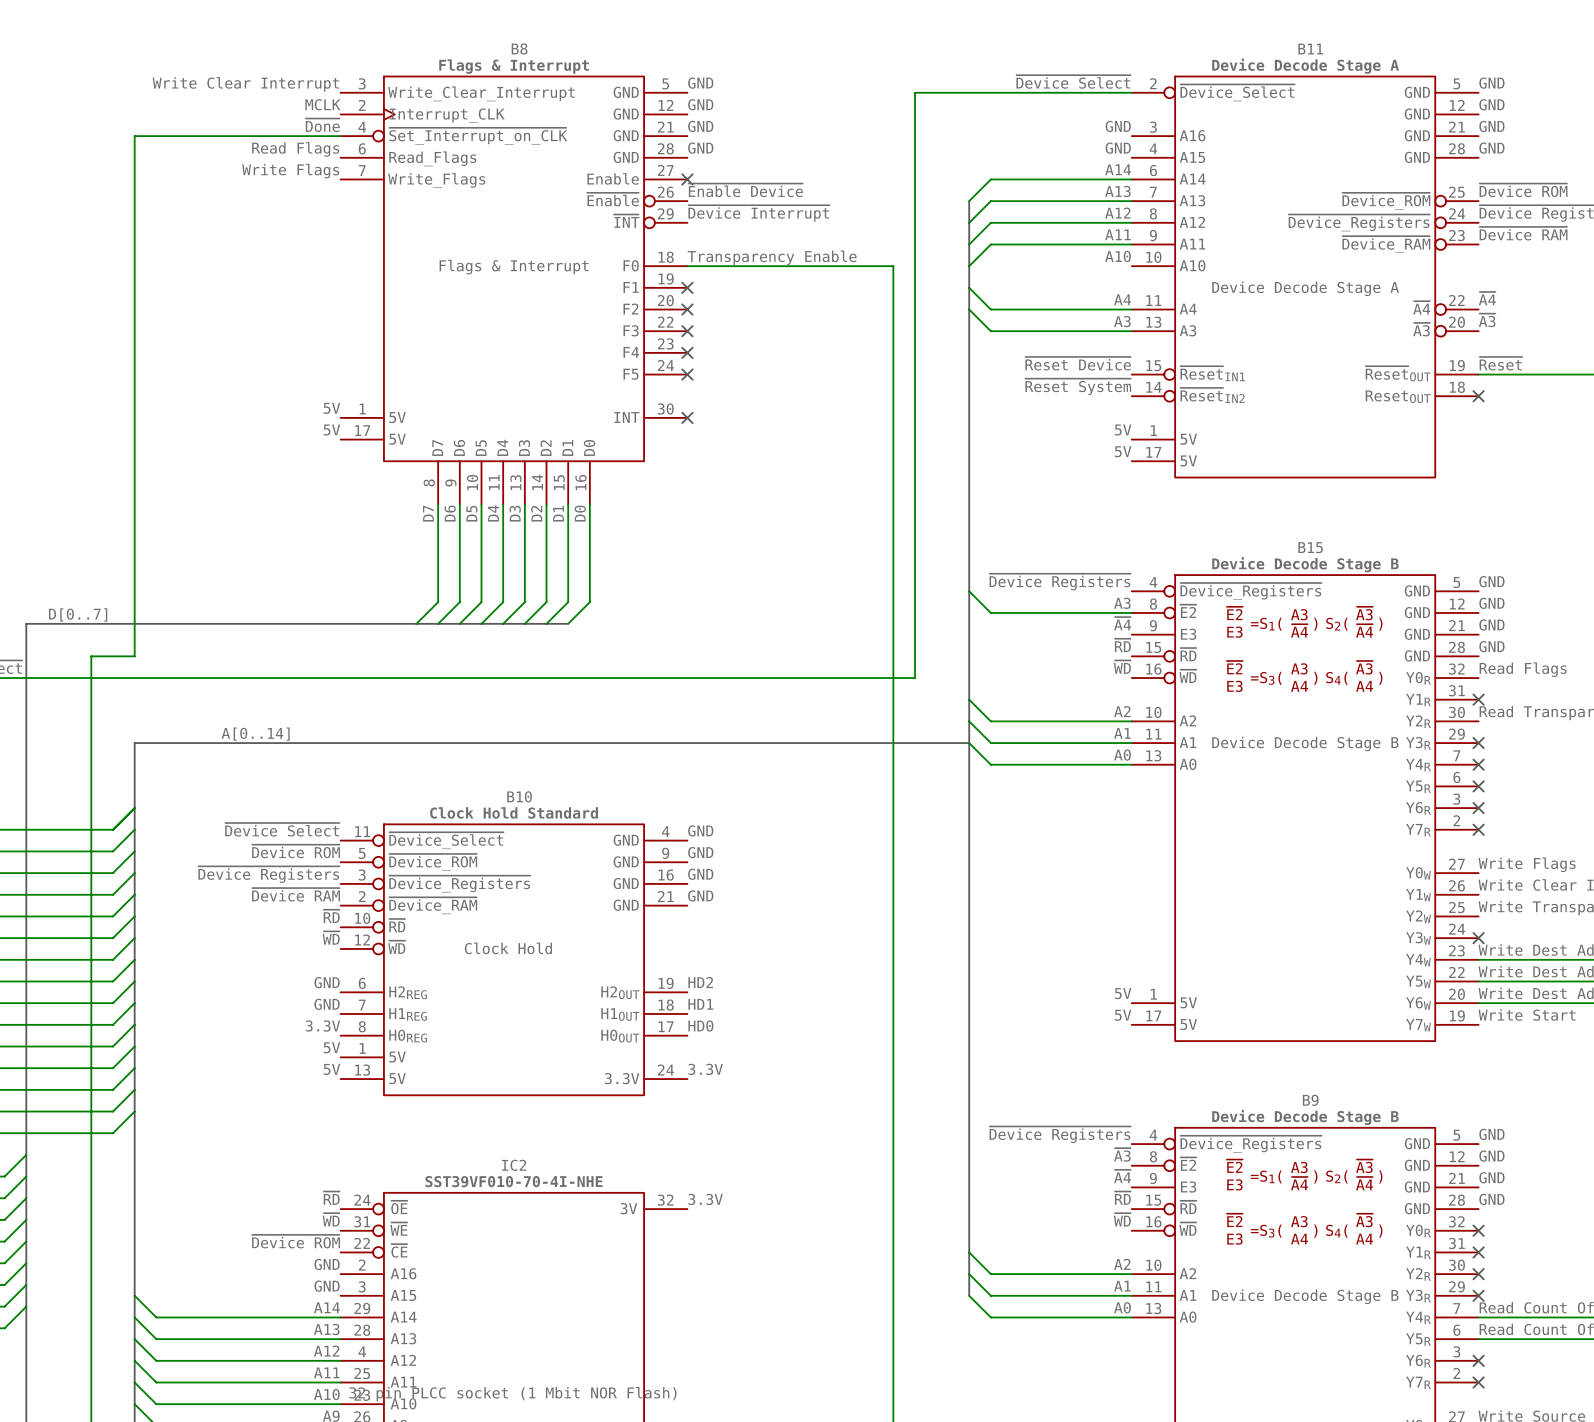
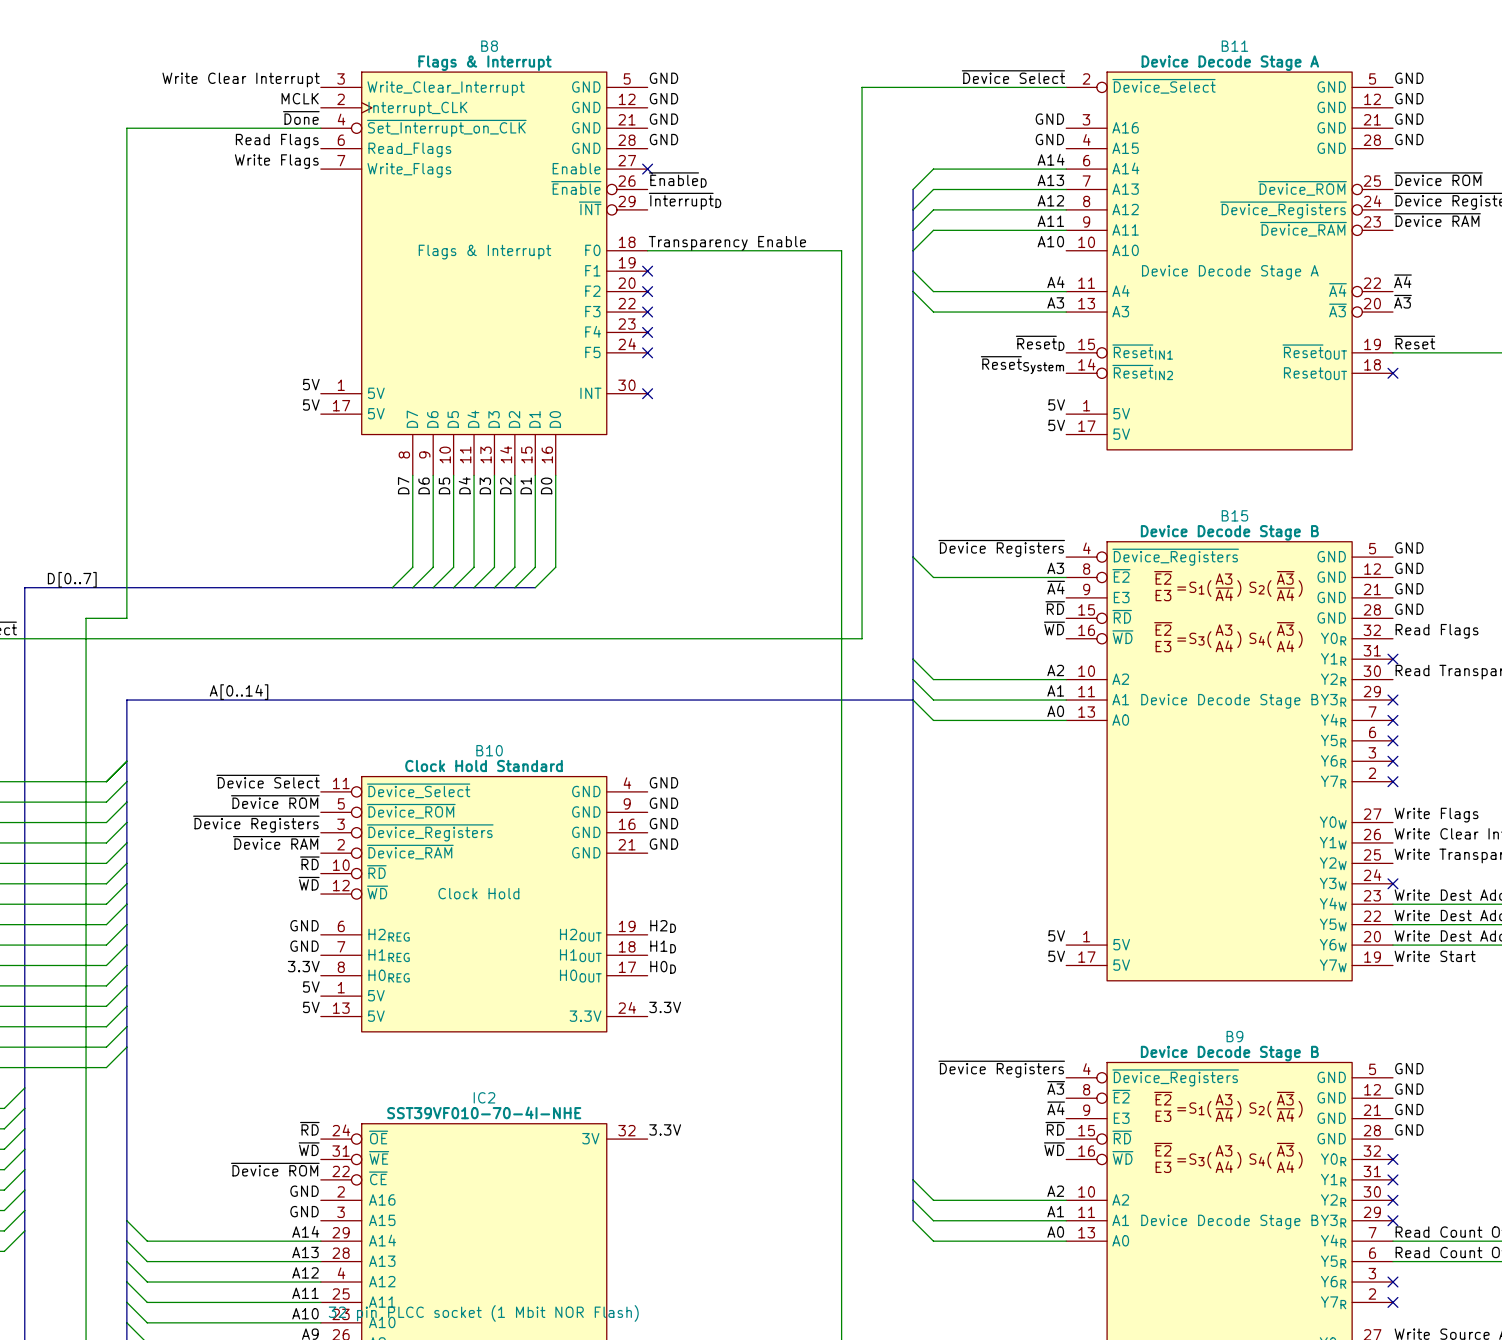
label: ~{Enable Device} (745, 190) -> ~{Enable}D (677, 179)
label: ~{Device Interrupt} (758, 213) -> ~{Interrupt}D (685, 201)
label: ~{Reset Device} (1078, 363) -> ~{Reset}D (1040, 343)
label: ~{Reset System} (1078, 386) -> ~{Reset}System (1022, 365)
label: HD2 (700, 982) -> H2D (663, 926)
label: HD1 (700, 1004) -> H1D (663, 946)
label: HD0 (700, 1026) -> H0D (663, 967)

